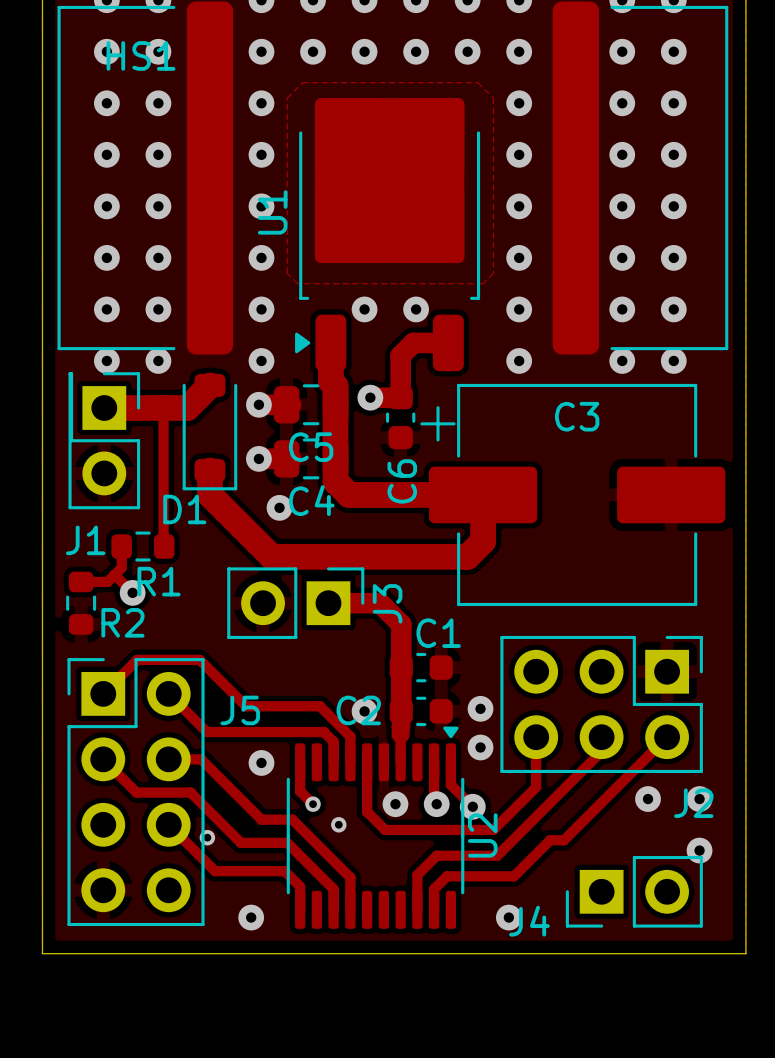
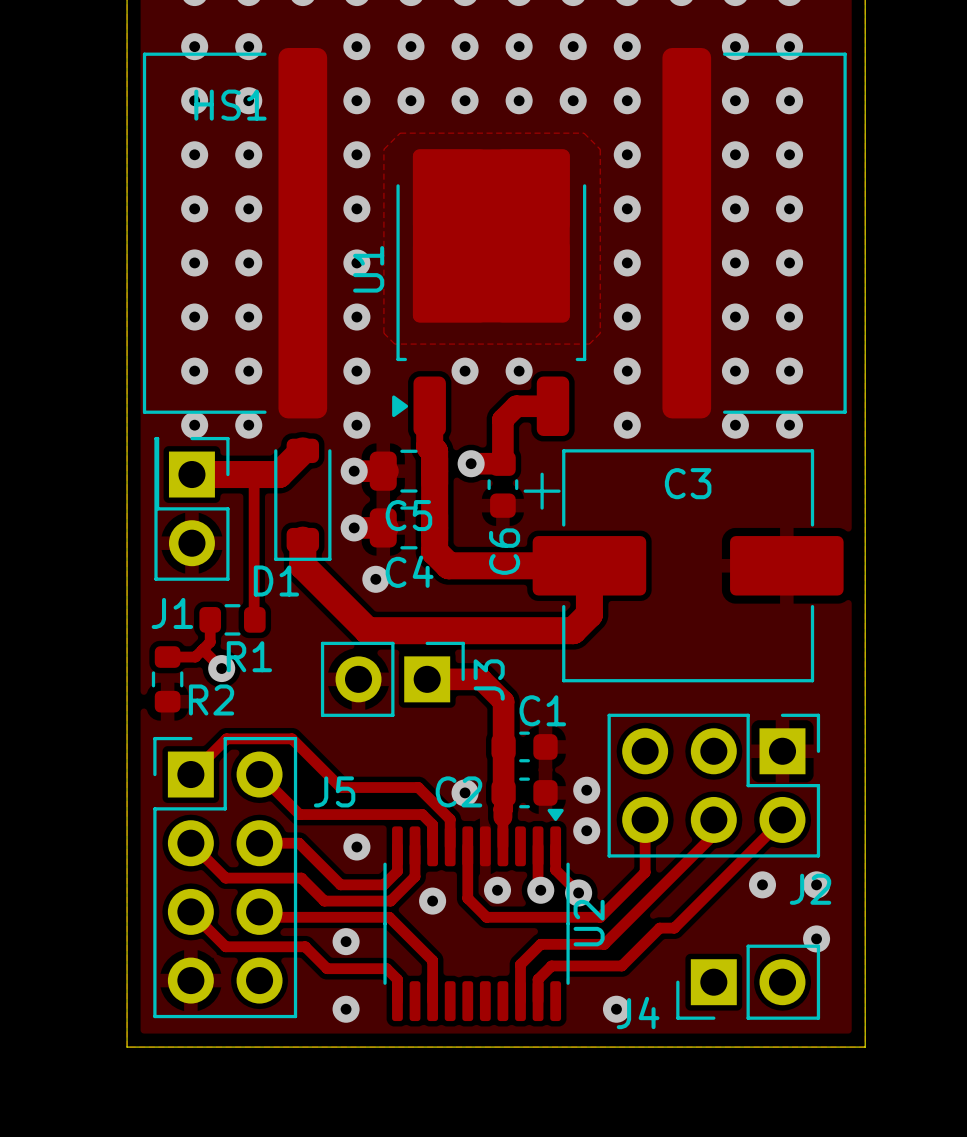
track: (201, 759) (261, 819) (292, 819) (350, 877) (350, 909) -> none
track: (300, 786) (300, 791) (313, 804) -> (397, 871) (383, 884) (340, 884) (299, 843) (293, 843)
track: (190, 792) (240, 842) (287, 842) (333, 889) -> (282, 878) (301, 878) (324, 901) (390, 901) (415, 876) (415, 846)
via: (313, 804) -> none
via: none -> (432, 901)
track: none -> (190, 911) (225, 946) (305, 946) (327, 968) (386, 968) (397, 979)
via: (338, 824) -> none
track: (173, 829) (215, 871) (284, 871) (300, 886) (300, 889) -> (264, 917) (389, 917) (432, 960) (432, 979)
via: (207, 837) -> none
via: none -> (346, 941)

